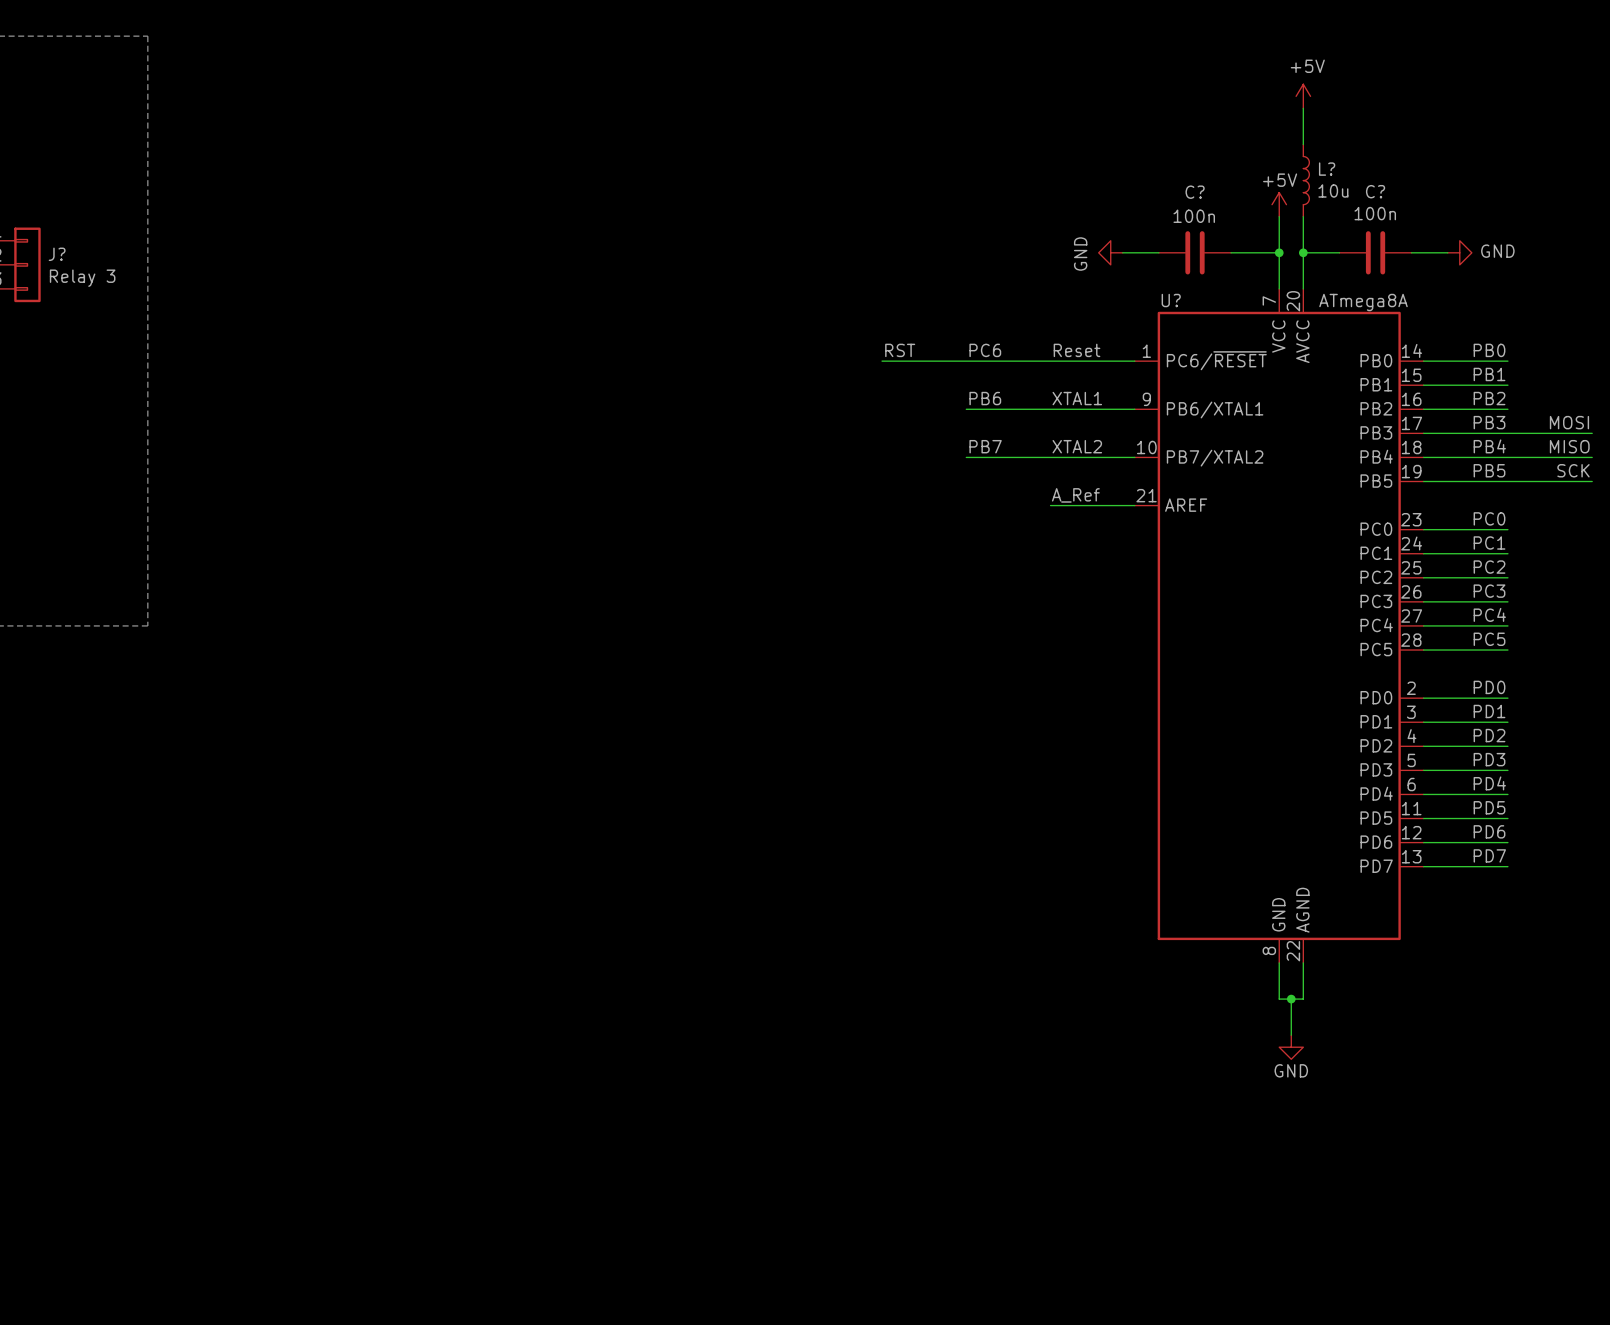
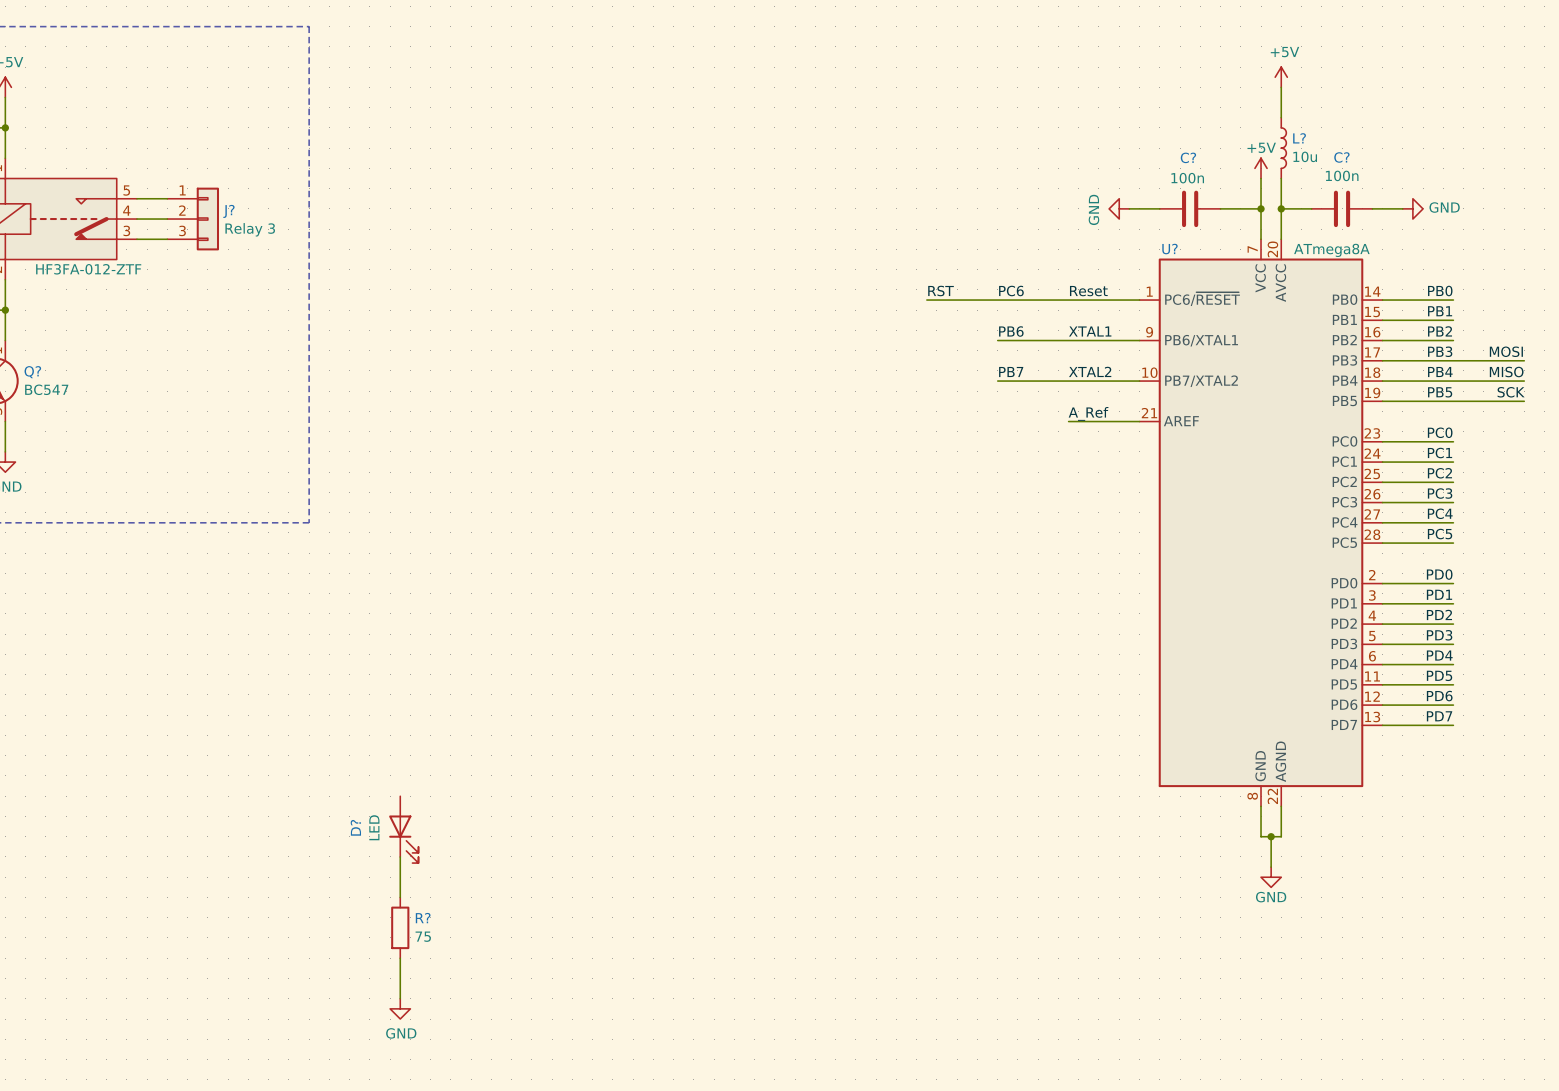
D?: none -> LED (403, 829)
wire: none -> (400, 856) (400, 897)
R?: none -> 75 (400, 927)
wire: none -> (400, 958) (400, 998)
power symbol: none -> GND (400, 1008)

